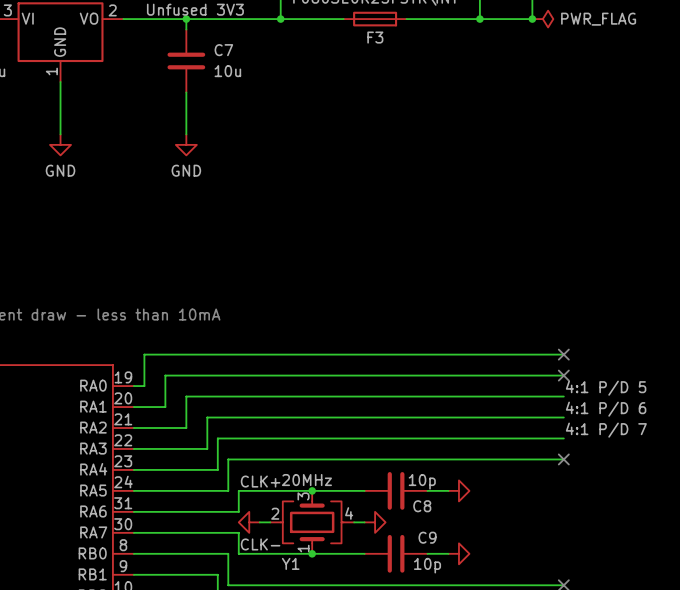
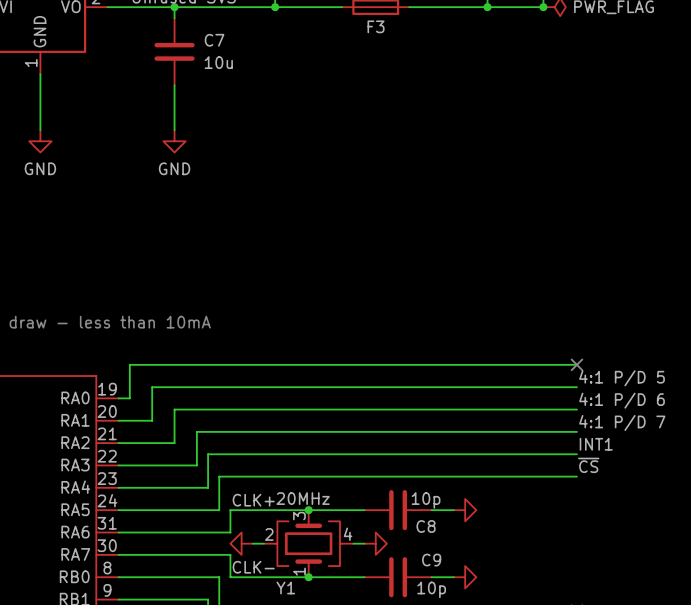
label: none -> 4:1 P/D 5 (622, 378)
no-connect mark: (563, 375) -> none
label: 4:1 P/D 5 (606, 388) -> 4:1 P/D 6 (622, 400)
label: 4:1 P/D 6 (606, 409) -> 4:1 P/D 7 (622, 423)
label: 4:1 P/D 7 (606, 430) -> INT1 (596, 444)
label: none -> ~{CS} (588, 465)
no-connect mark: (563, 459) -> none

